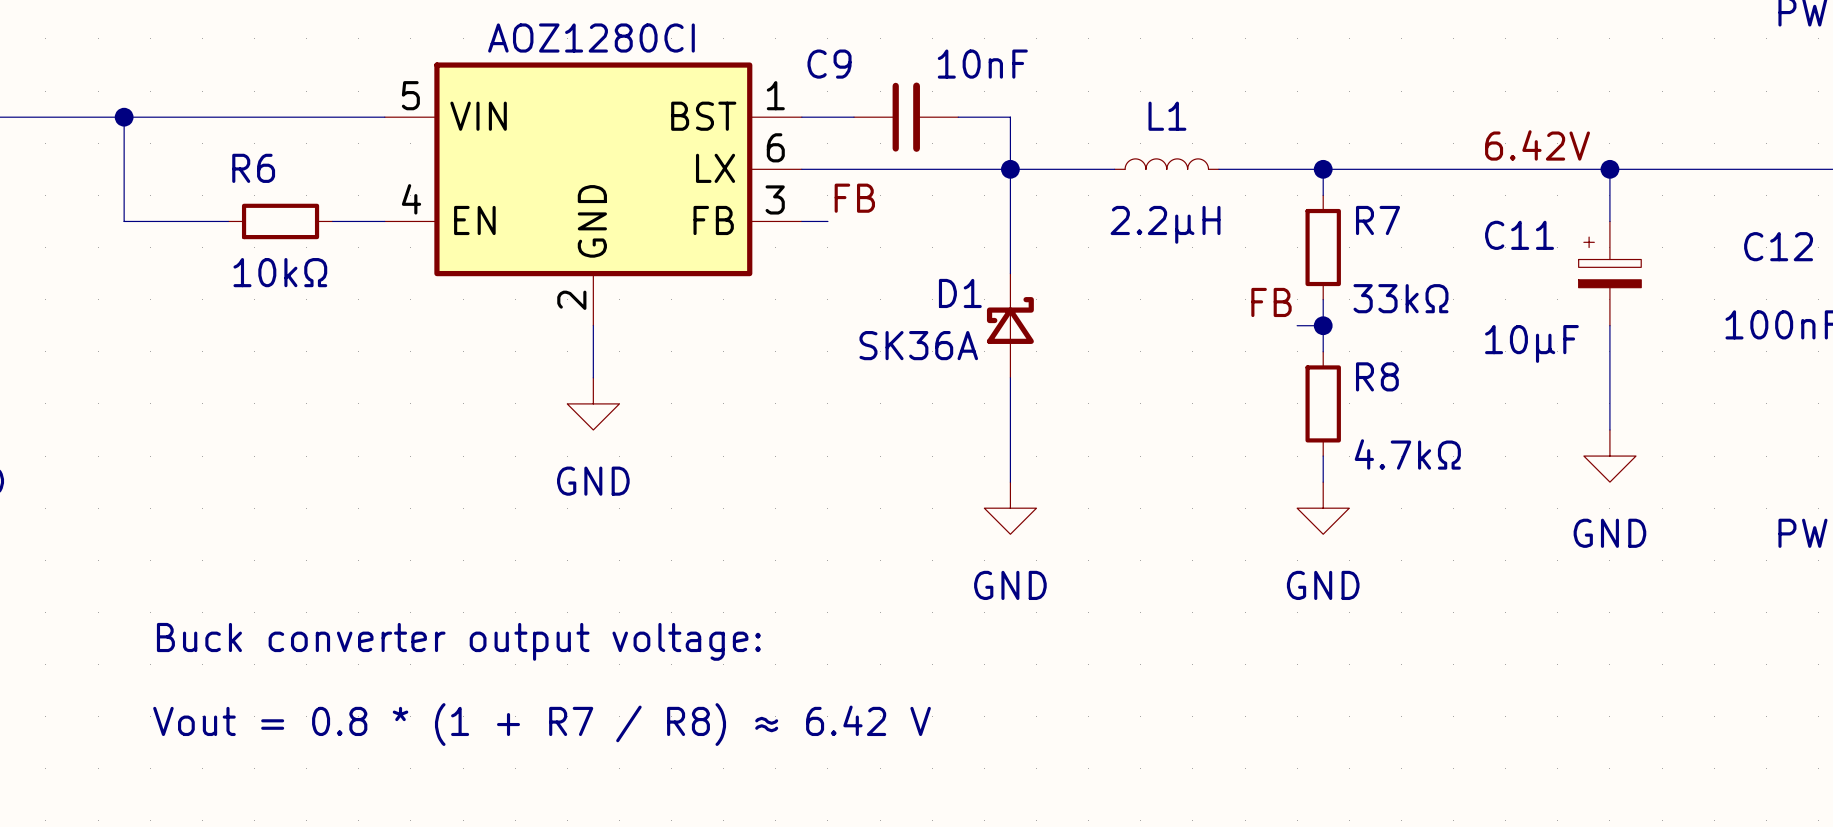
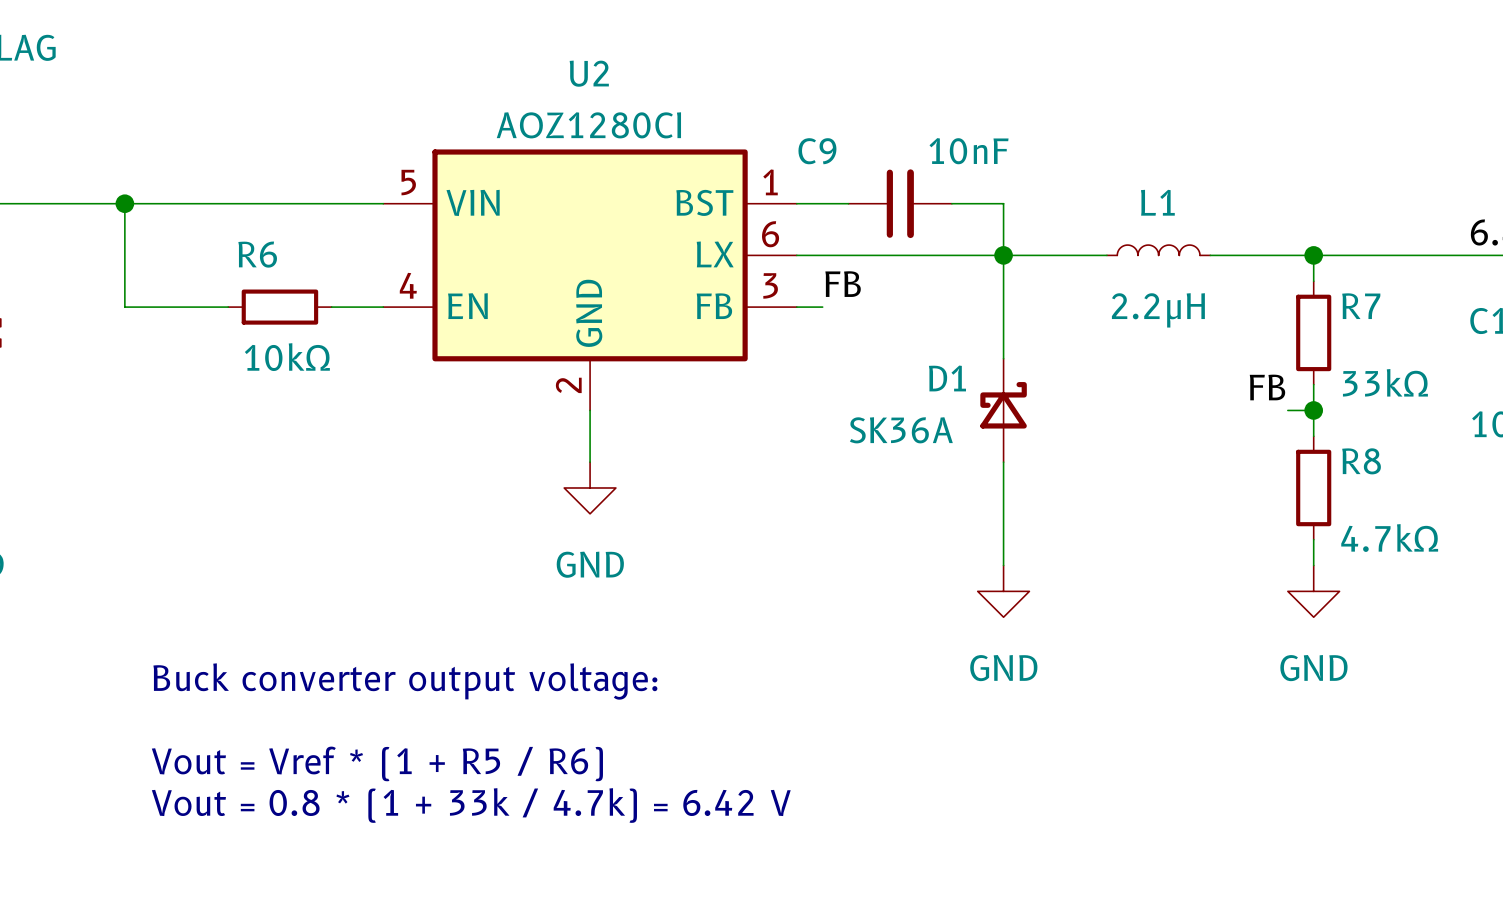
text position: Buck converter output voltage: (458, 641) -> Buck converter output voltage: (405, 681)
text: none -> Vout = Vref * (1 + R5 / R6) (377, 763)
text: Vout = 0.8 * (1 + R7 / R8) ≈ 6.42 V (542, 724) -> Vout = 0.8 * (1 + 33k / 4.7k) = 6.42 V (471, 805)

